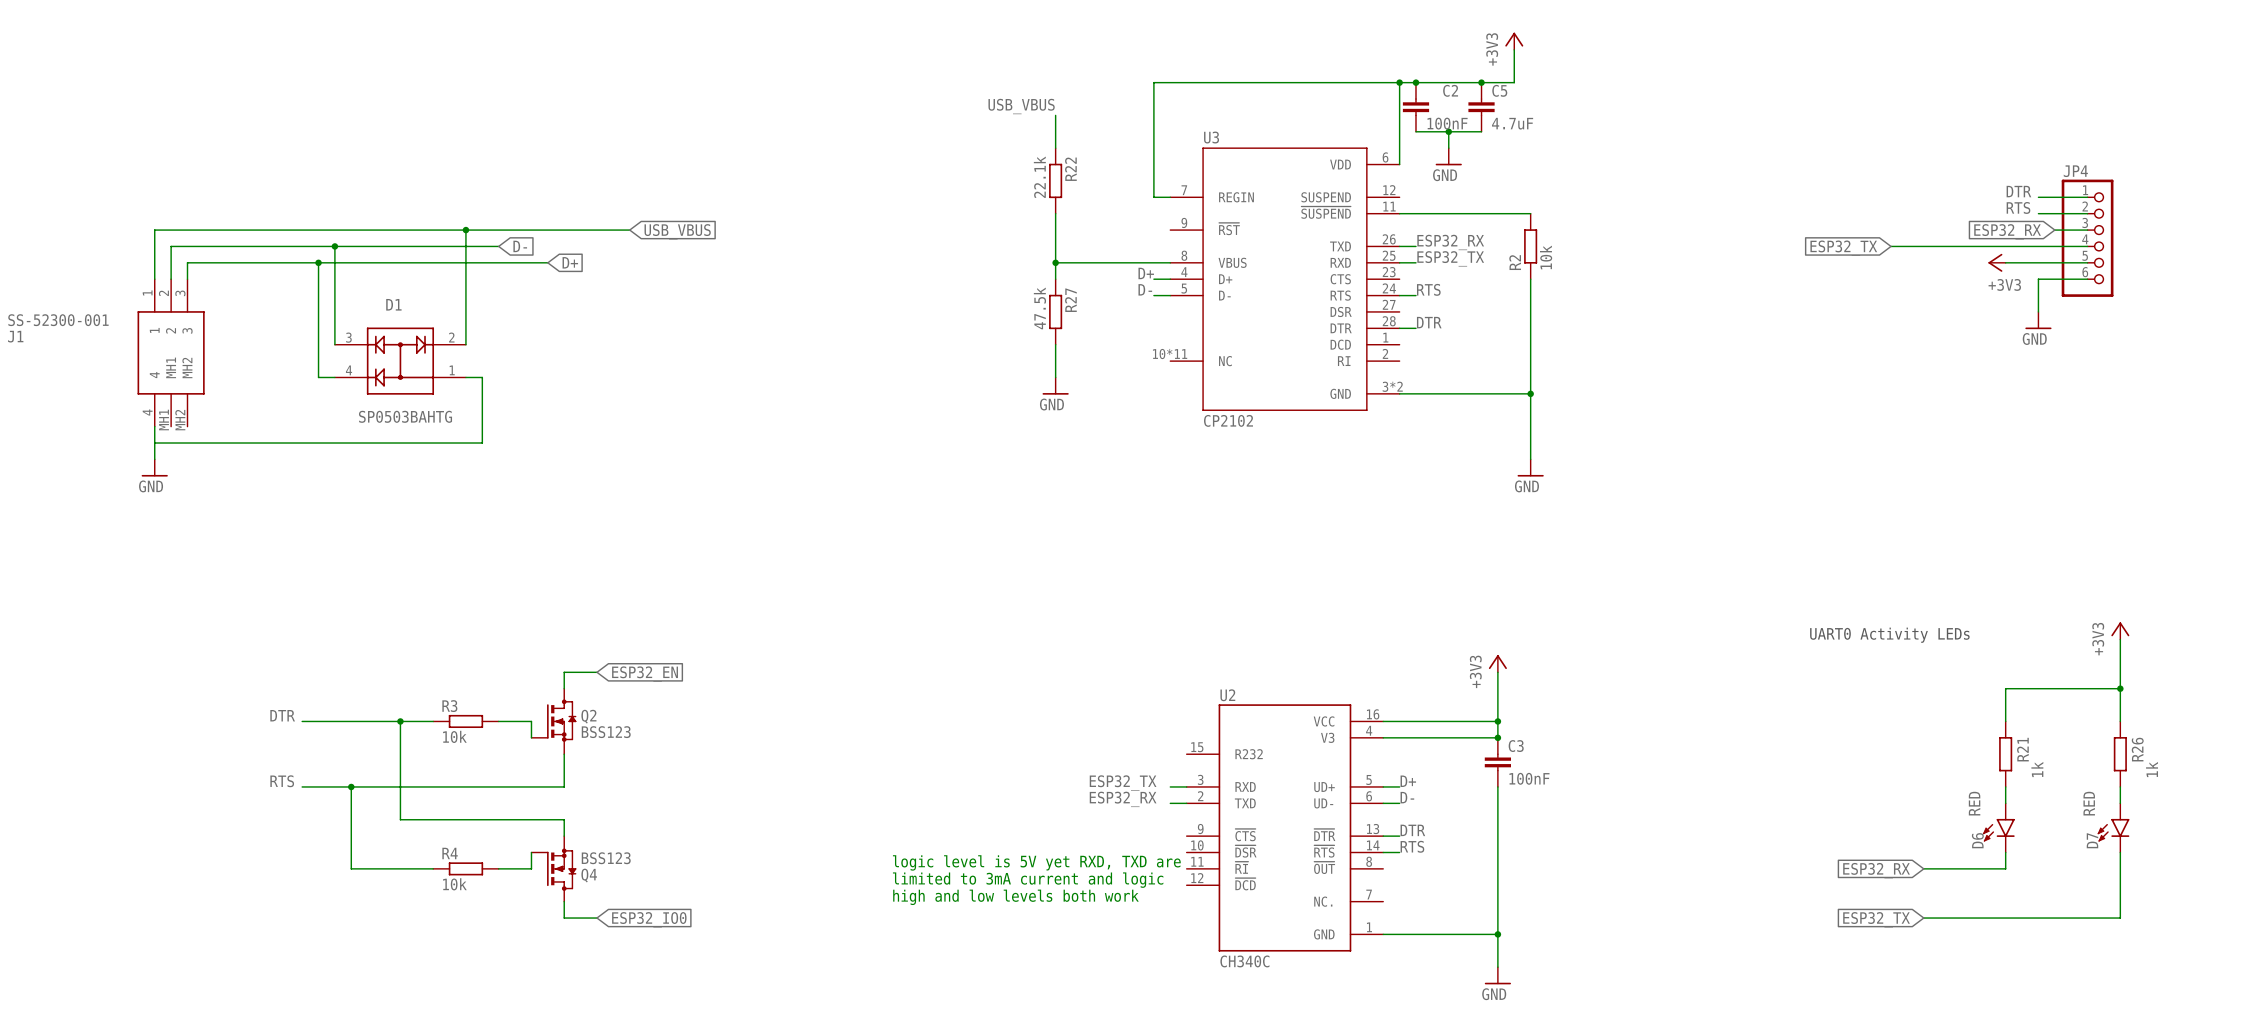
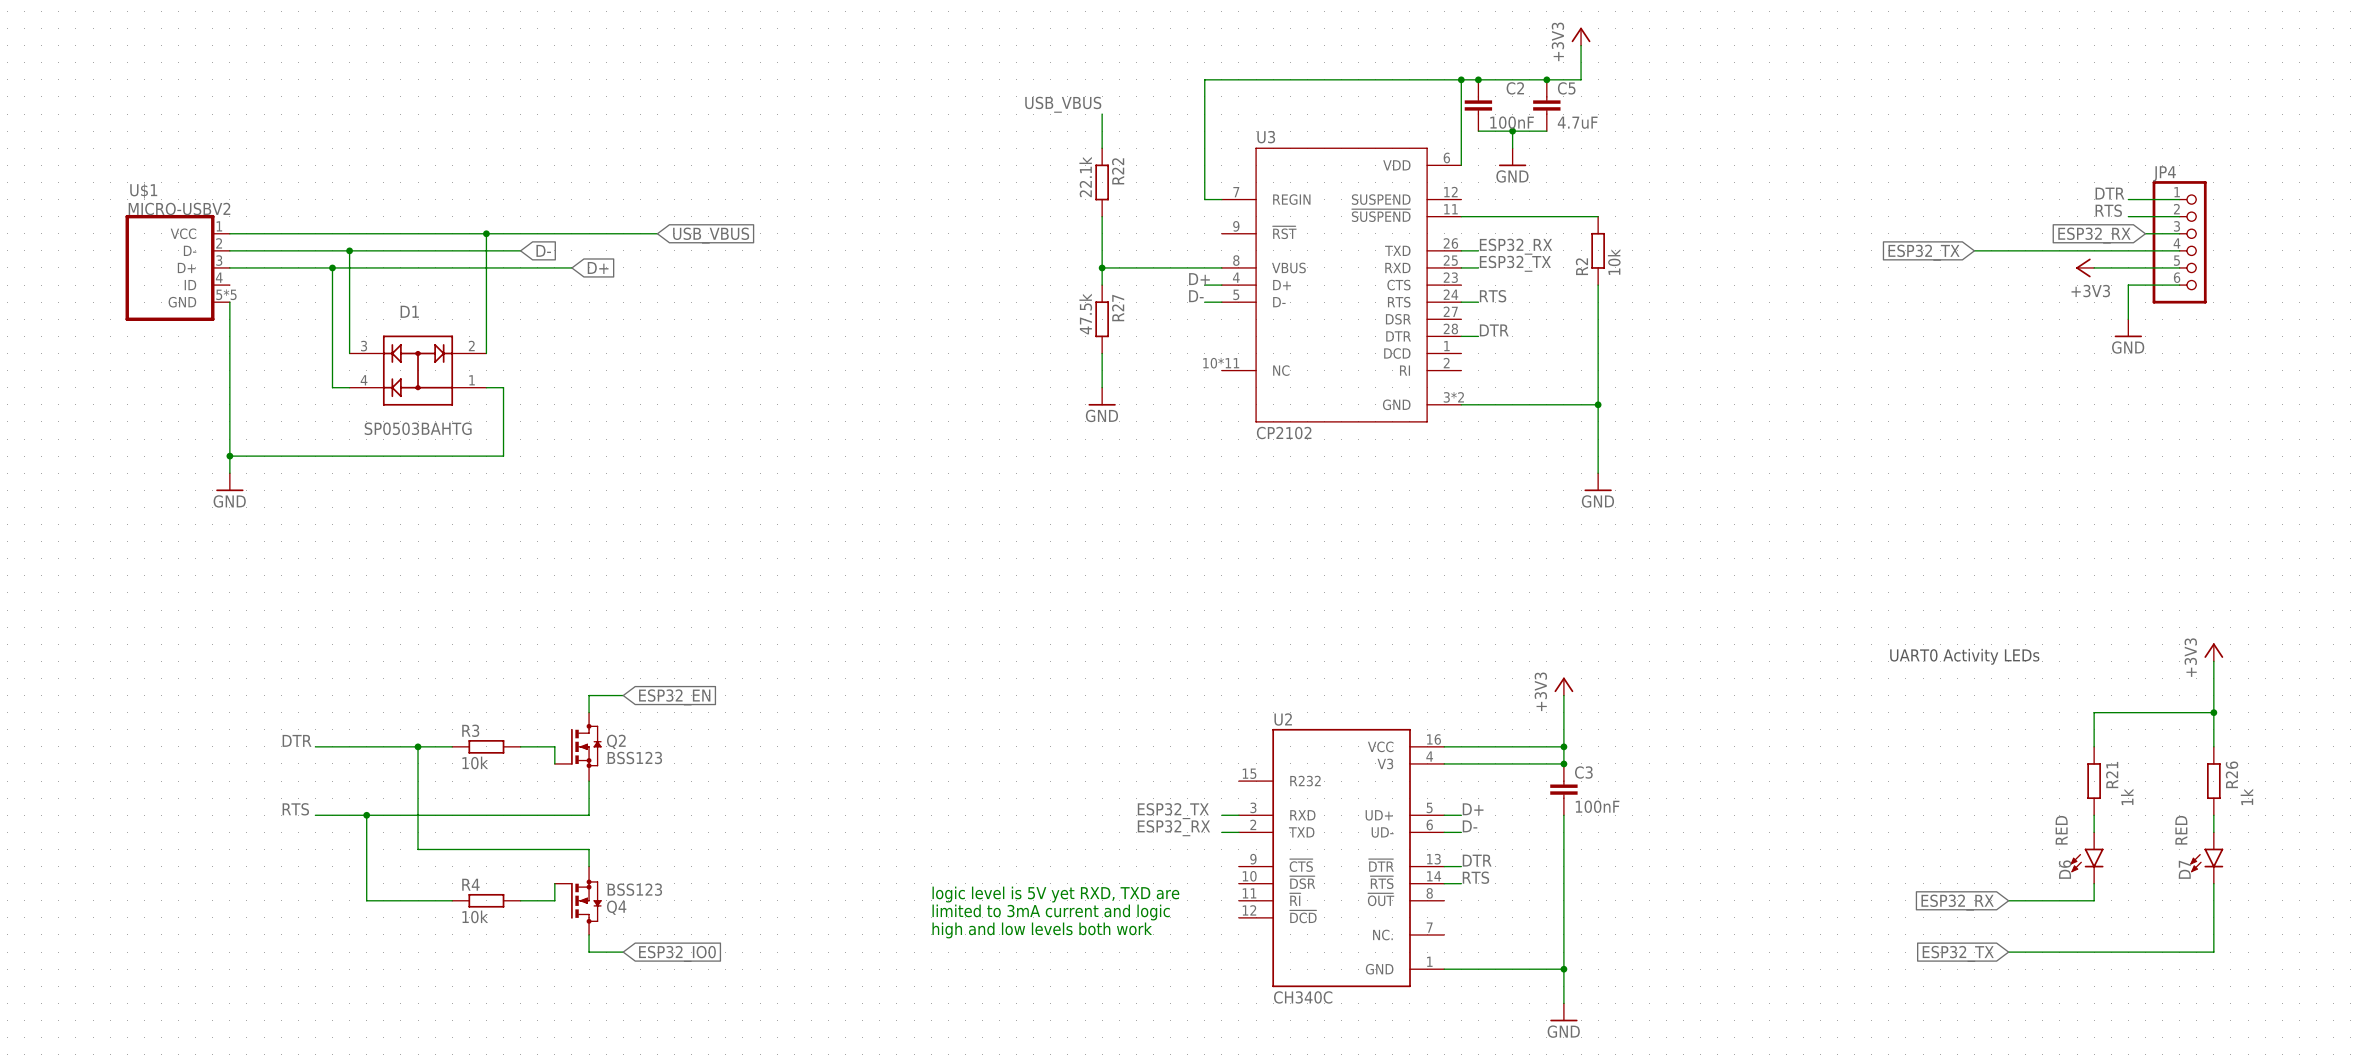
wire: (220, 230) (154, 230) (154, 279) -> none
wire: (220, 246) (171, 246) (171, 279) -> none
U$1: none -> MICRO-USBV2 (177, 267)
wire: (220, 262) (187, 262) (187, 279) -> none
wire: none -> (229, 302) (229, 473)
J1: SS-52300-001 (171, 352) -> none
wire: (154, 426) (154, 459) -> none
wire: (154, 443) (220, 443) -> none
junction: none -> (229, 456)
power symbol position: GND (154, 467) -> GND (229, 482)

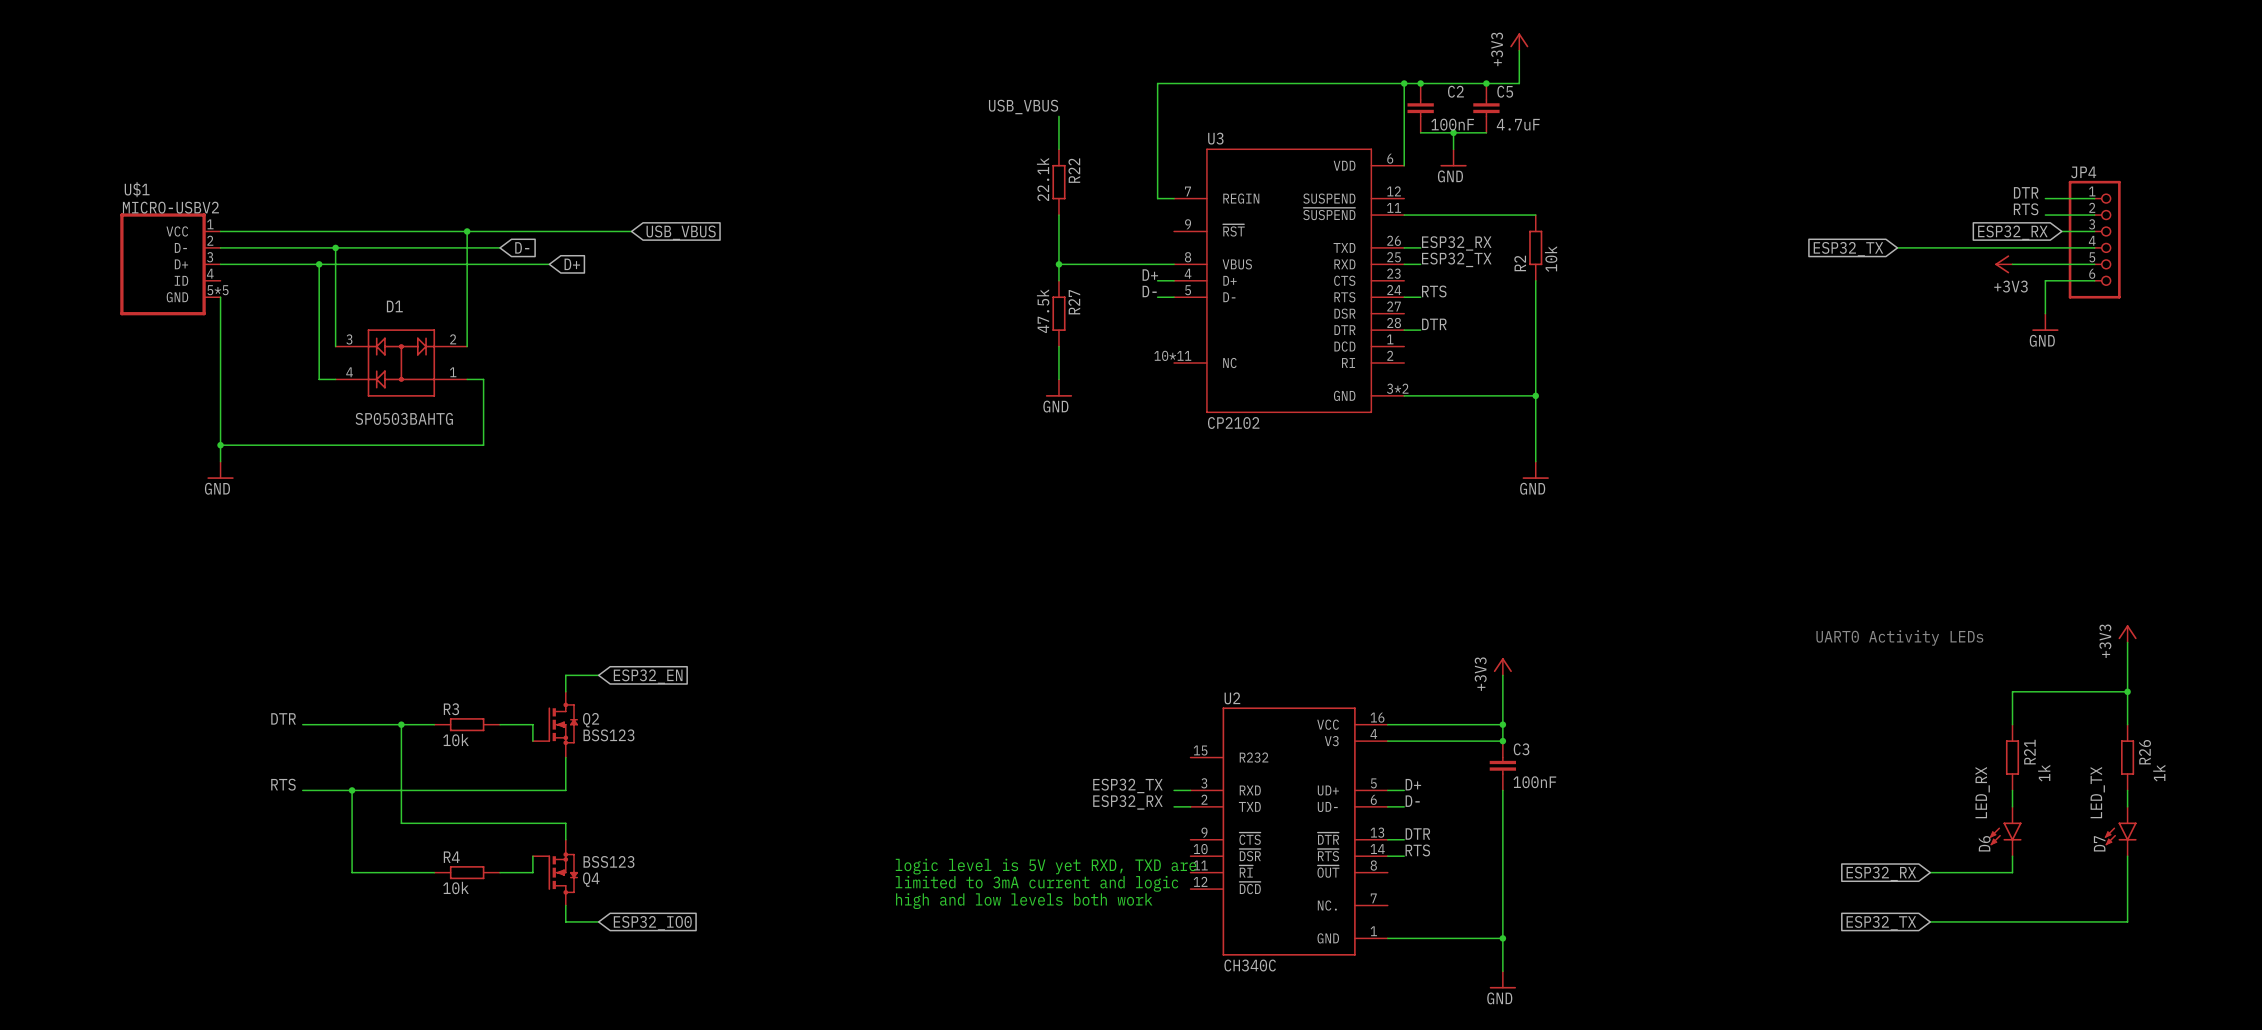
D6 value: RED (2061, 830) -> LED_RX (1982, 792)
D7 value: RED (2181, 830) -> LED_TX (2097, 792)

